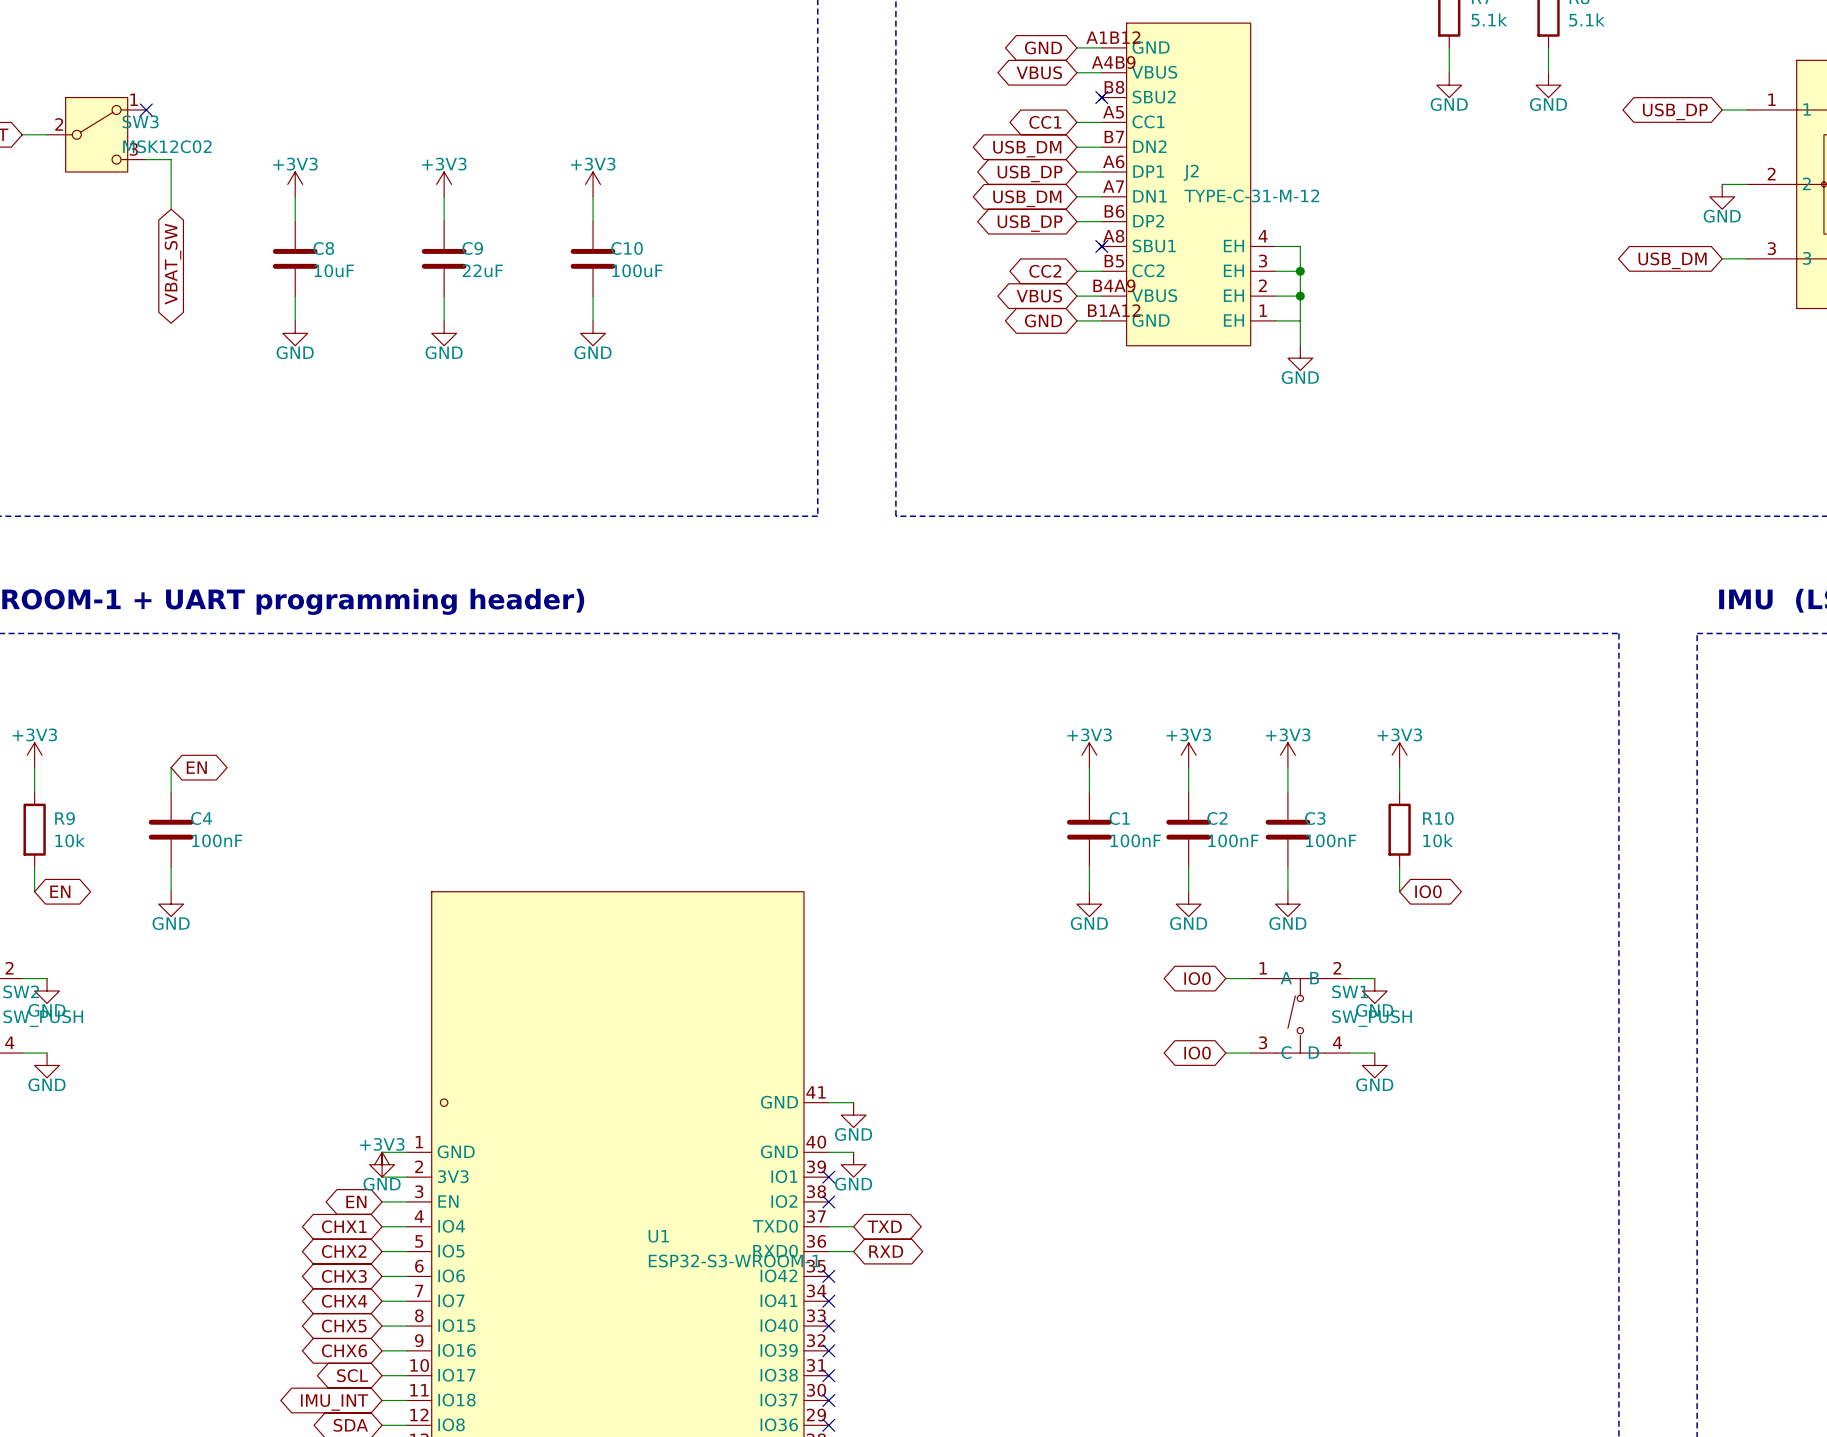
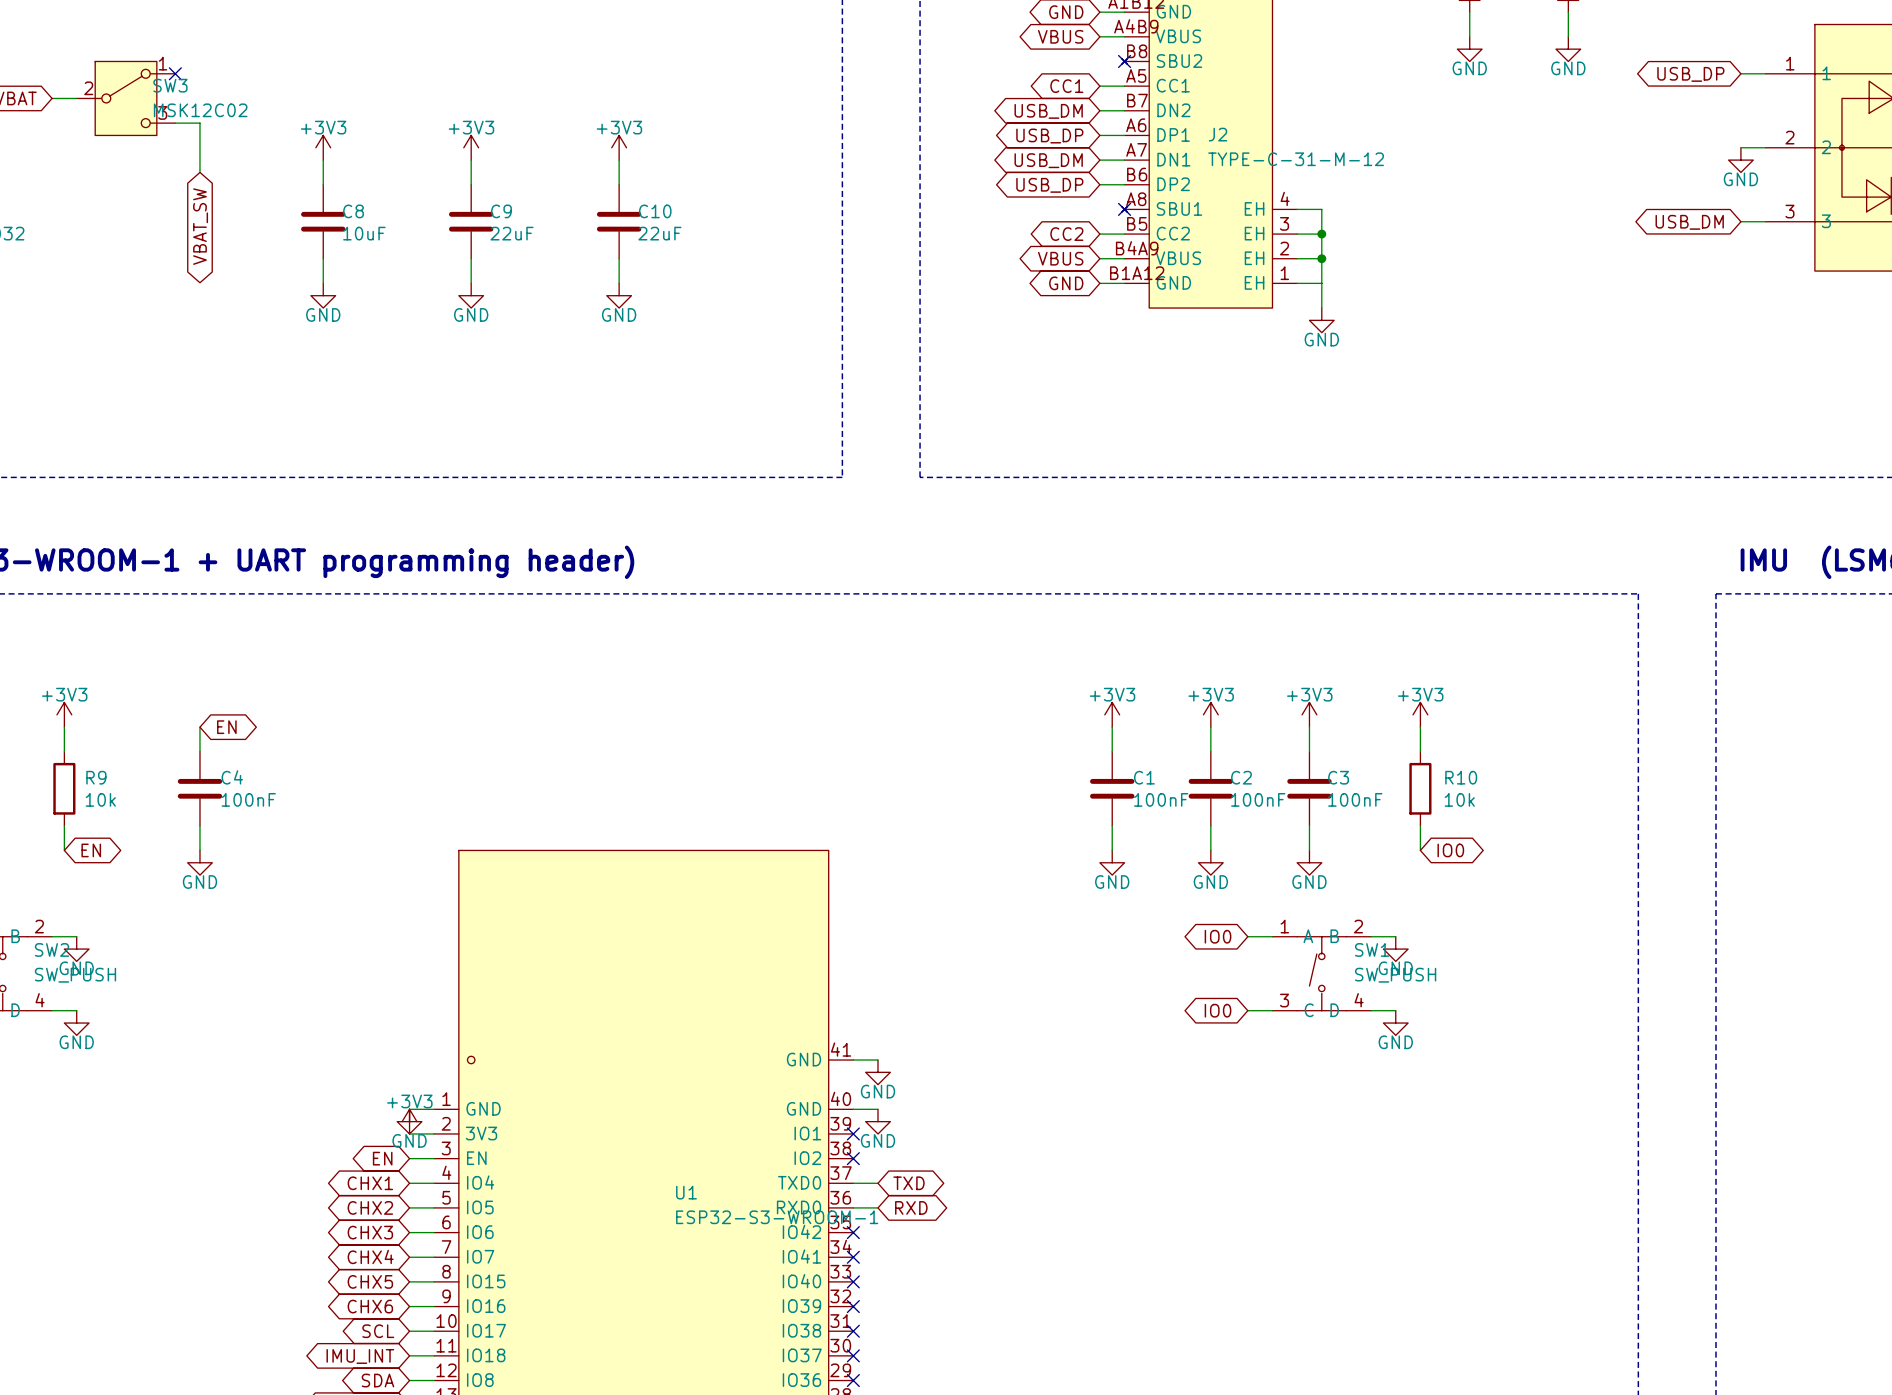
C10 value: 100uF (637, 270) -> 22uF (659, 233)

